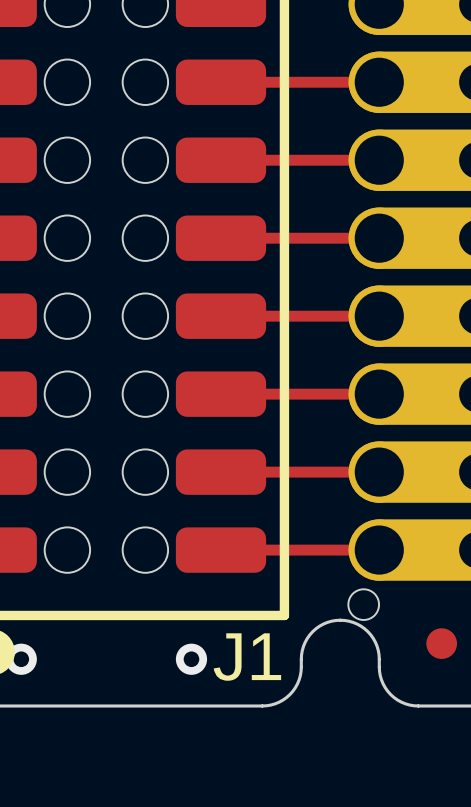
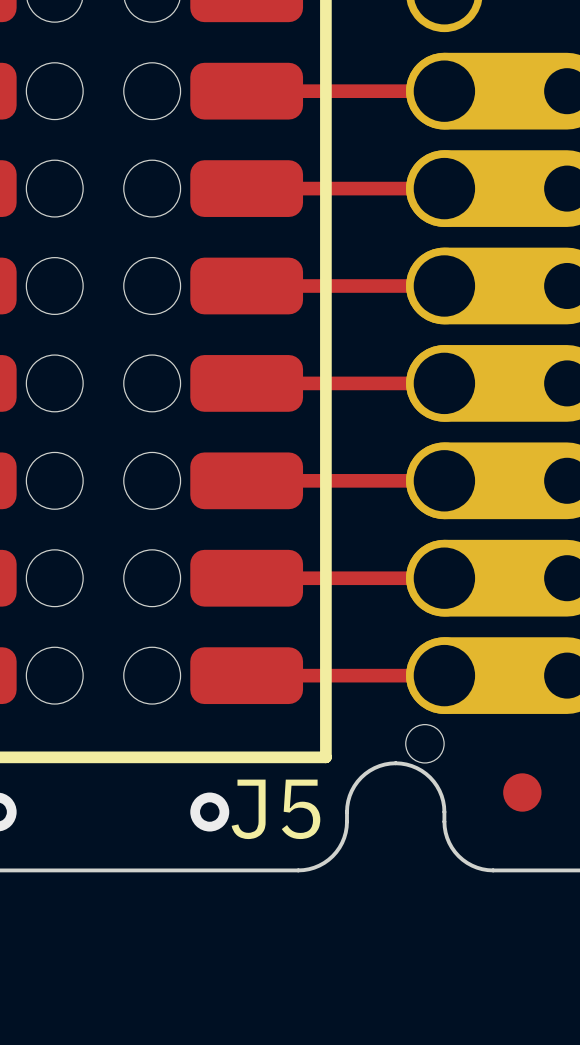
J1 name: J1 (247, 657) -> J5 (275, 809)

